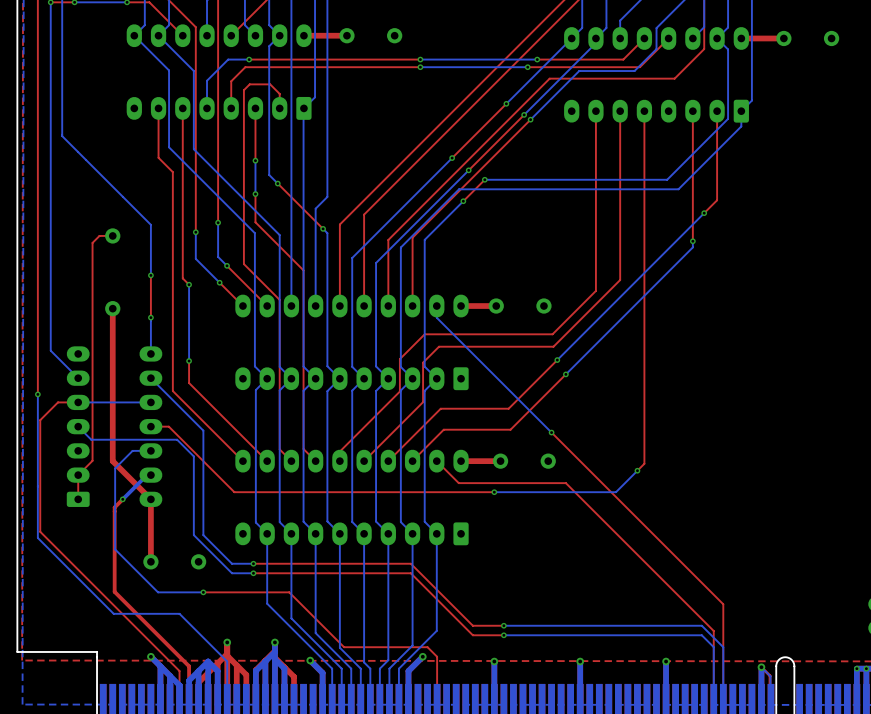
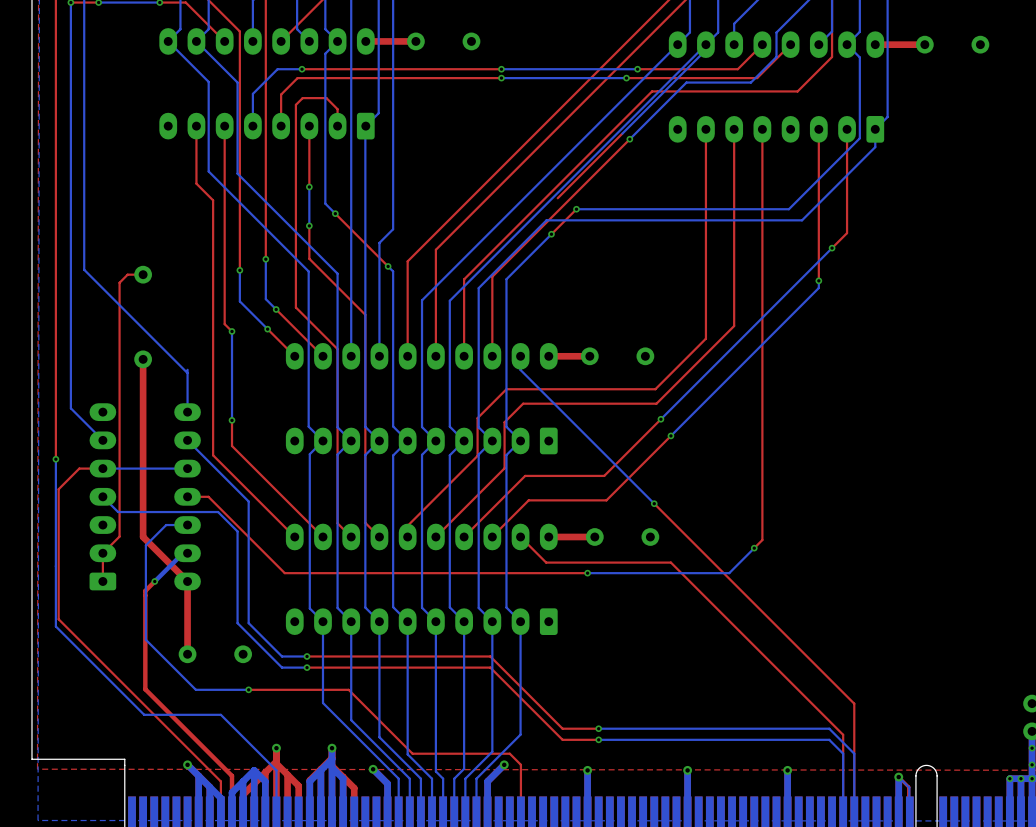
top track: (506, 103) (452, 158) -> none
bottom track: none -> (601, 120) (538, 183)
via: (506, 103) -> none
via: (524, 114) -> none
bottom track: (62, 136) (150, 224) (150, 275) -> (84, 158) (84, 269) (187, 373)
via: (452, 158) -> none
bottom track: (468, 170) (376, 263) -> (705, 44) (449, 300) (449, 306)
via: (468, 170) -> none
top track: (150, 275) (150, 317) -> none
via: (150, 275) -> none
via: (150, 317) -> none

